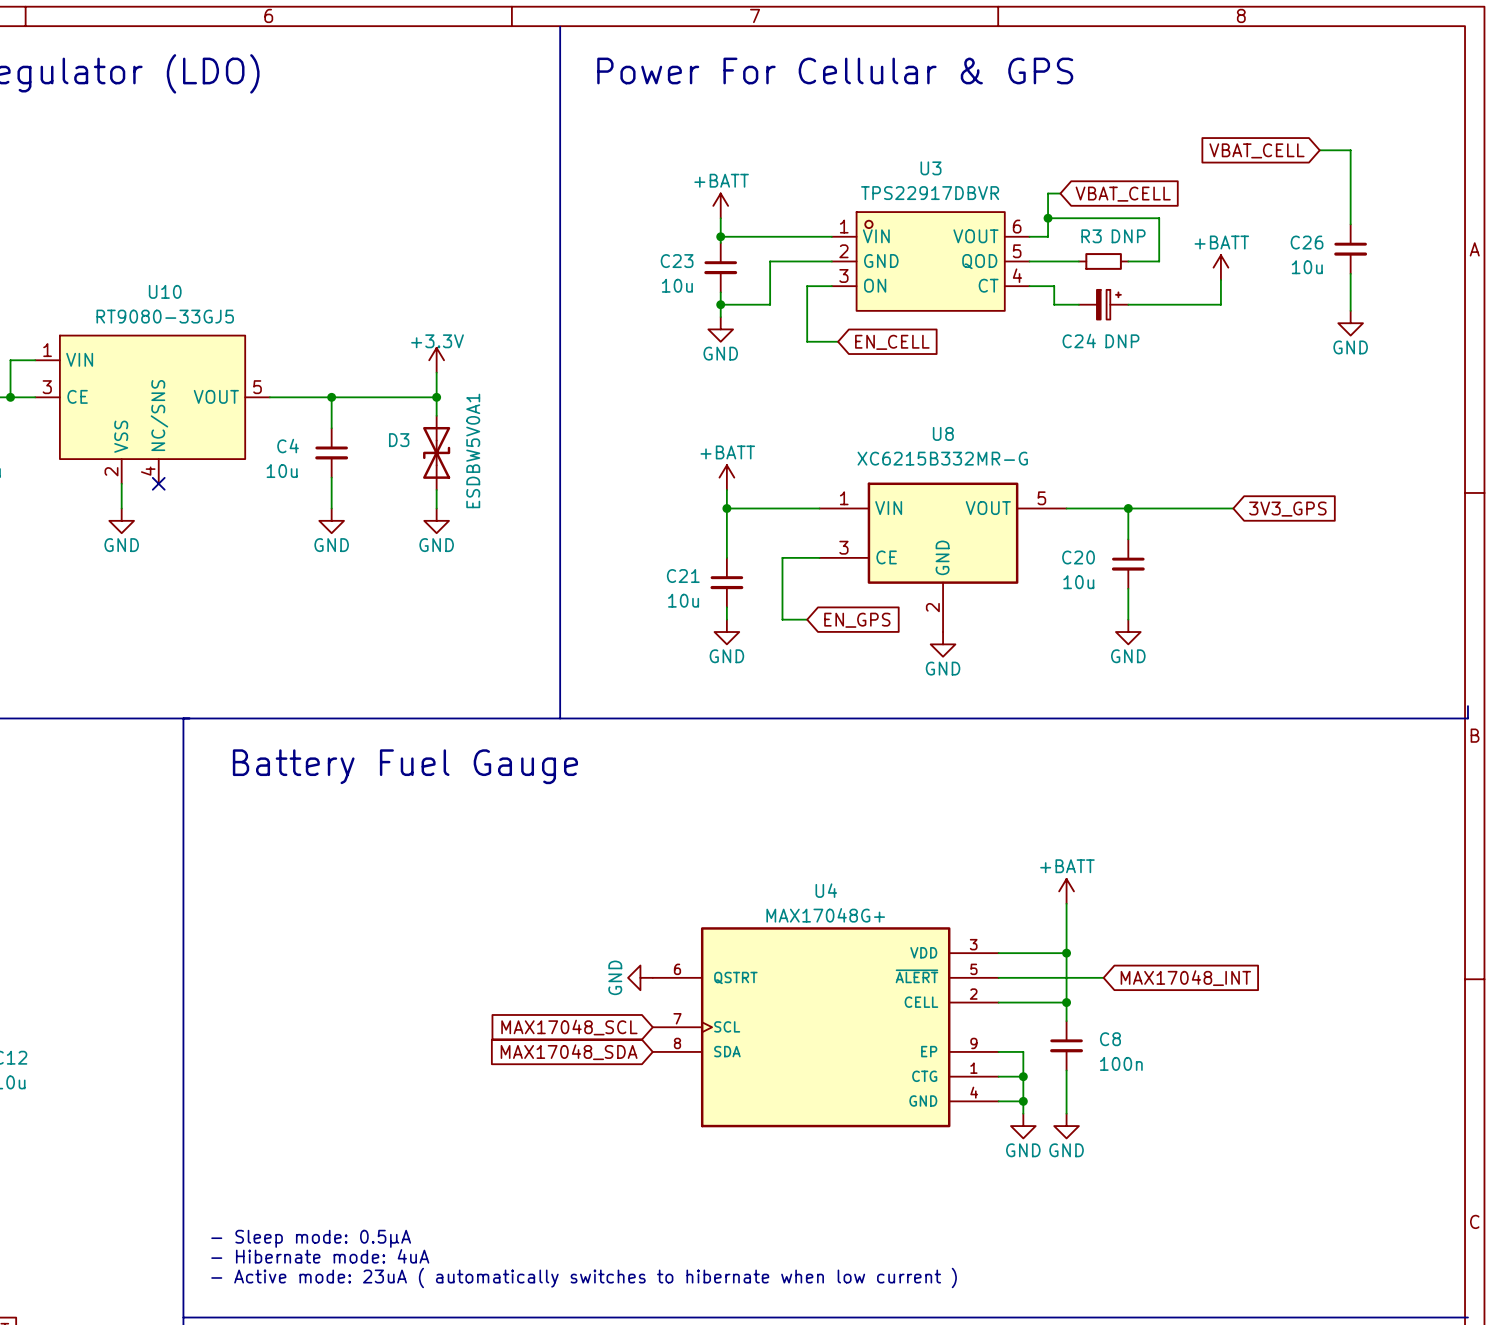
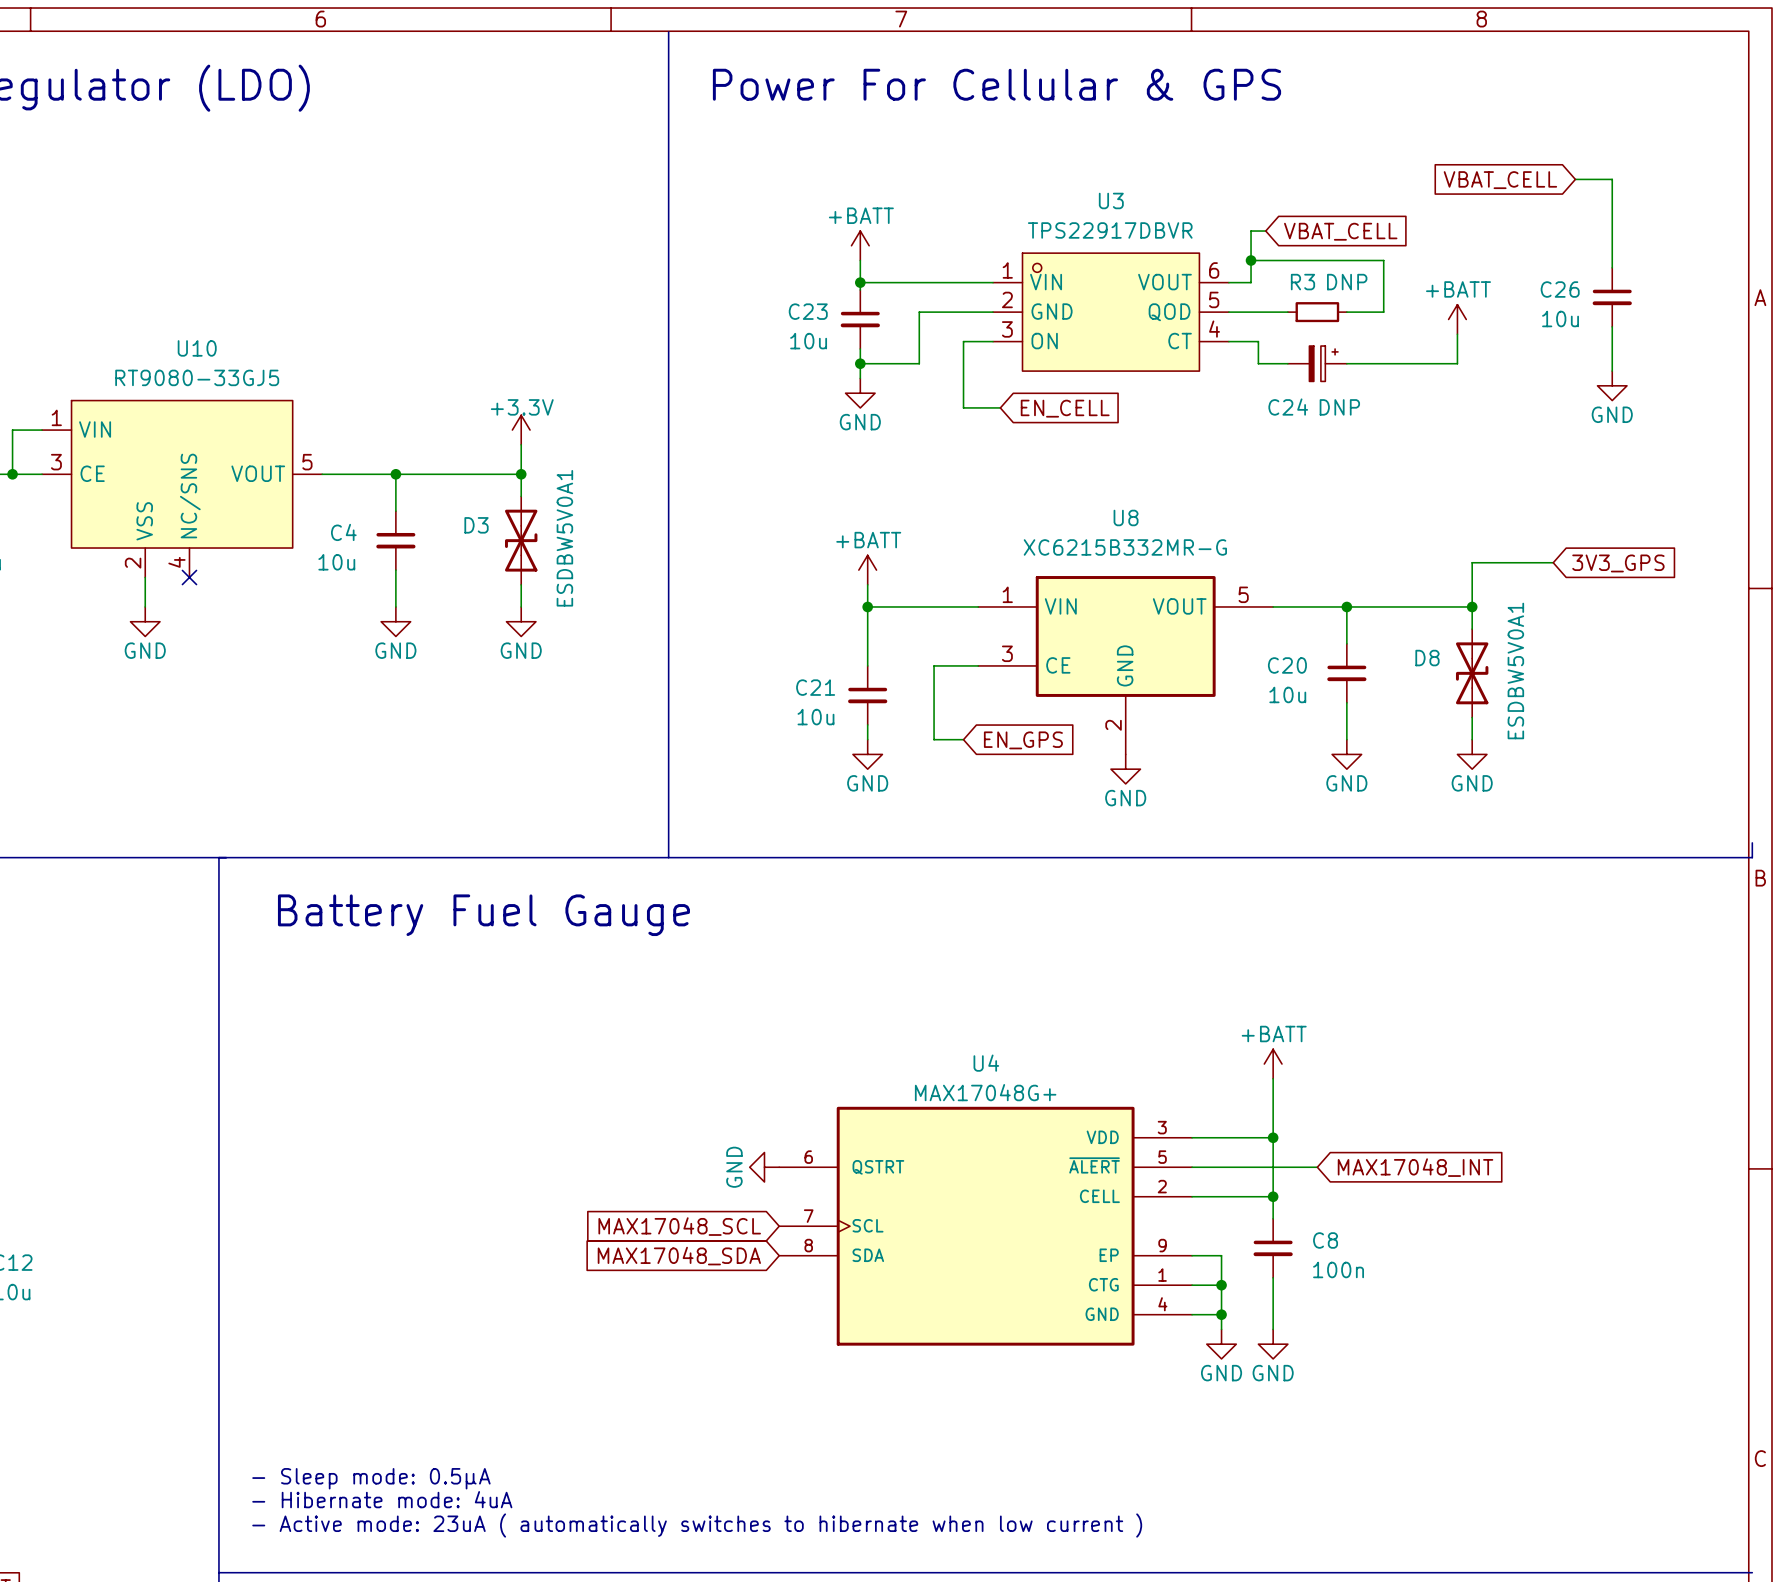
wire: none -> (1553, 562) (1472, 562) (1472, 629)
junction: none -> (1472, 606)
global label position: 3V3_GPS (1287, 509) -> 3V3_GPS (1618, 563)
D8: none -> ESDBW5V0A1 (1472, 673)
wire: none -> (1472, 717) (1472, 739)
power symbol: none -> GND (1472, 754)

